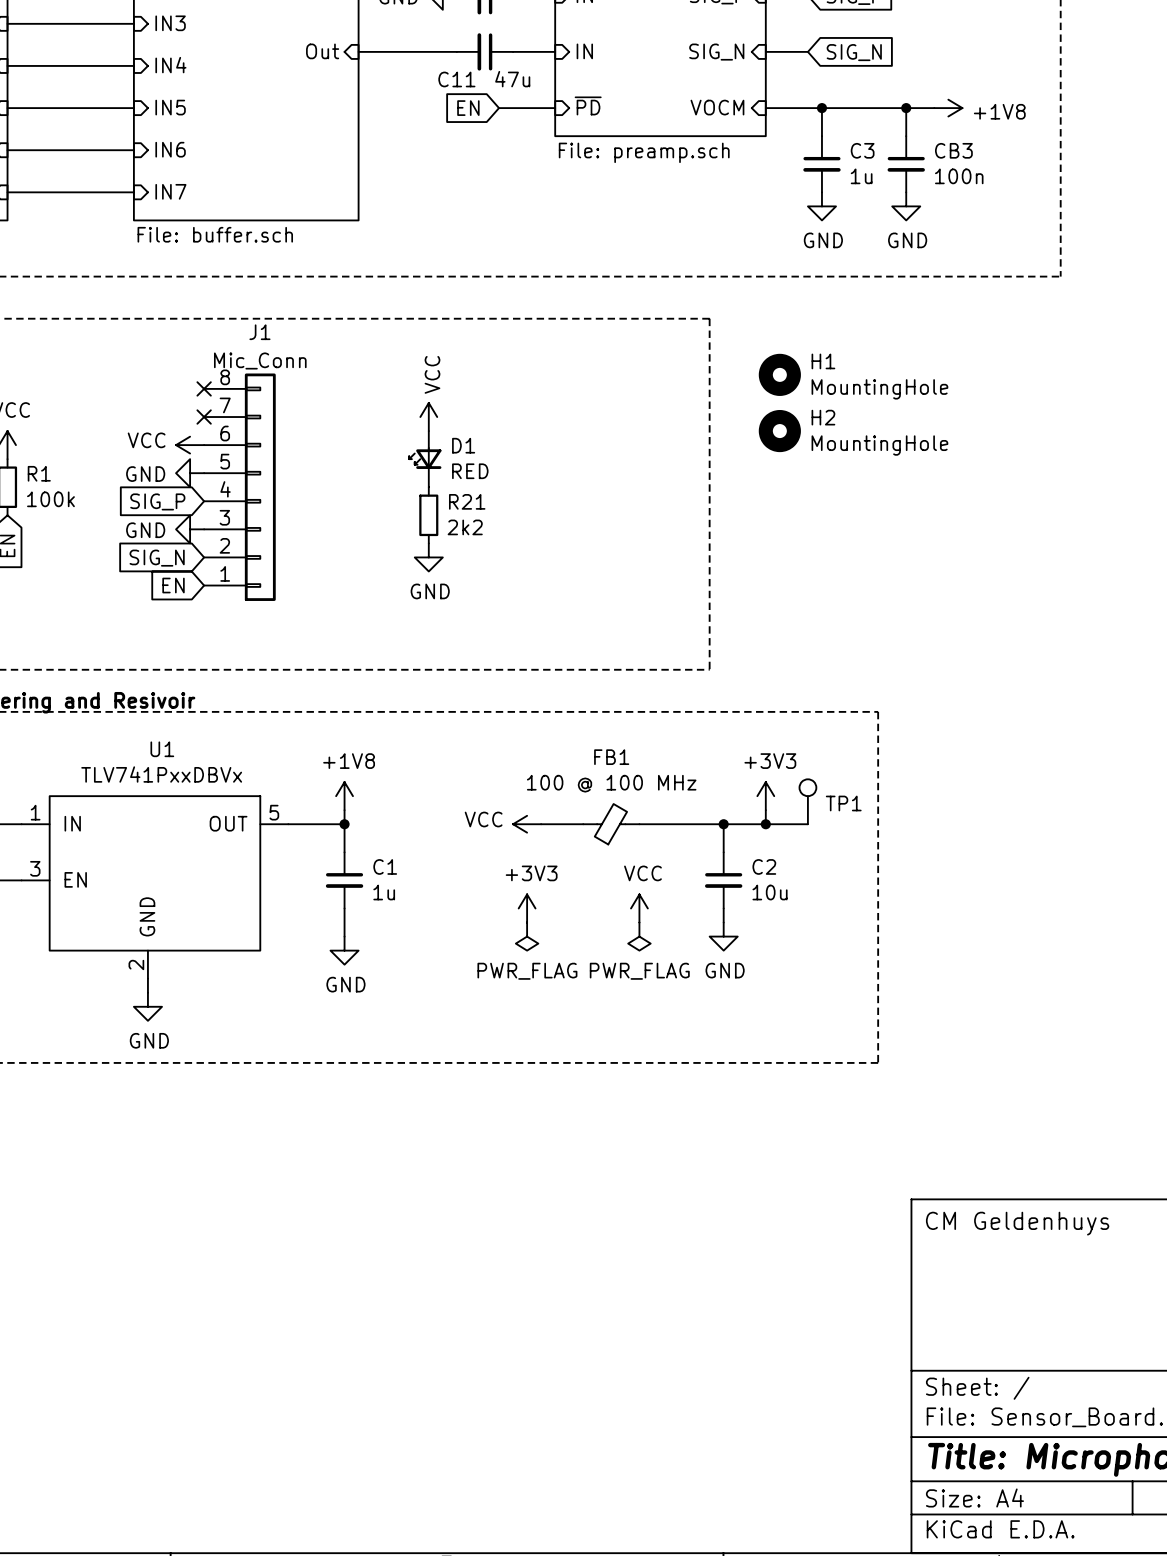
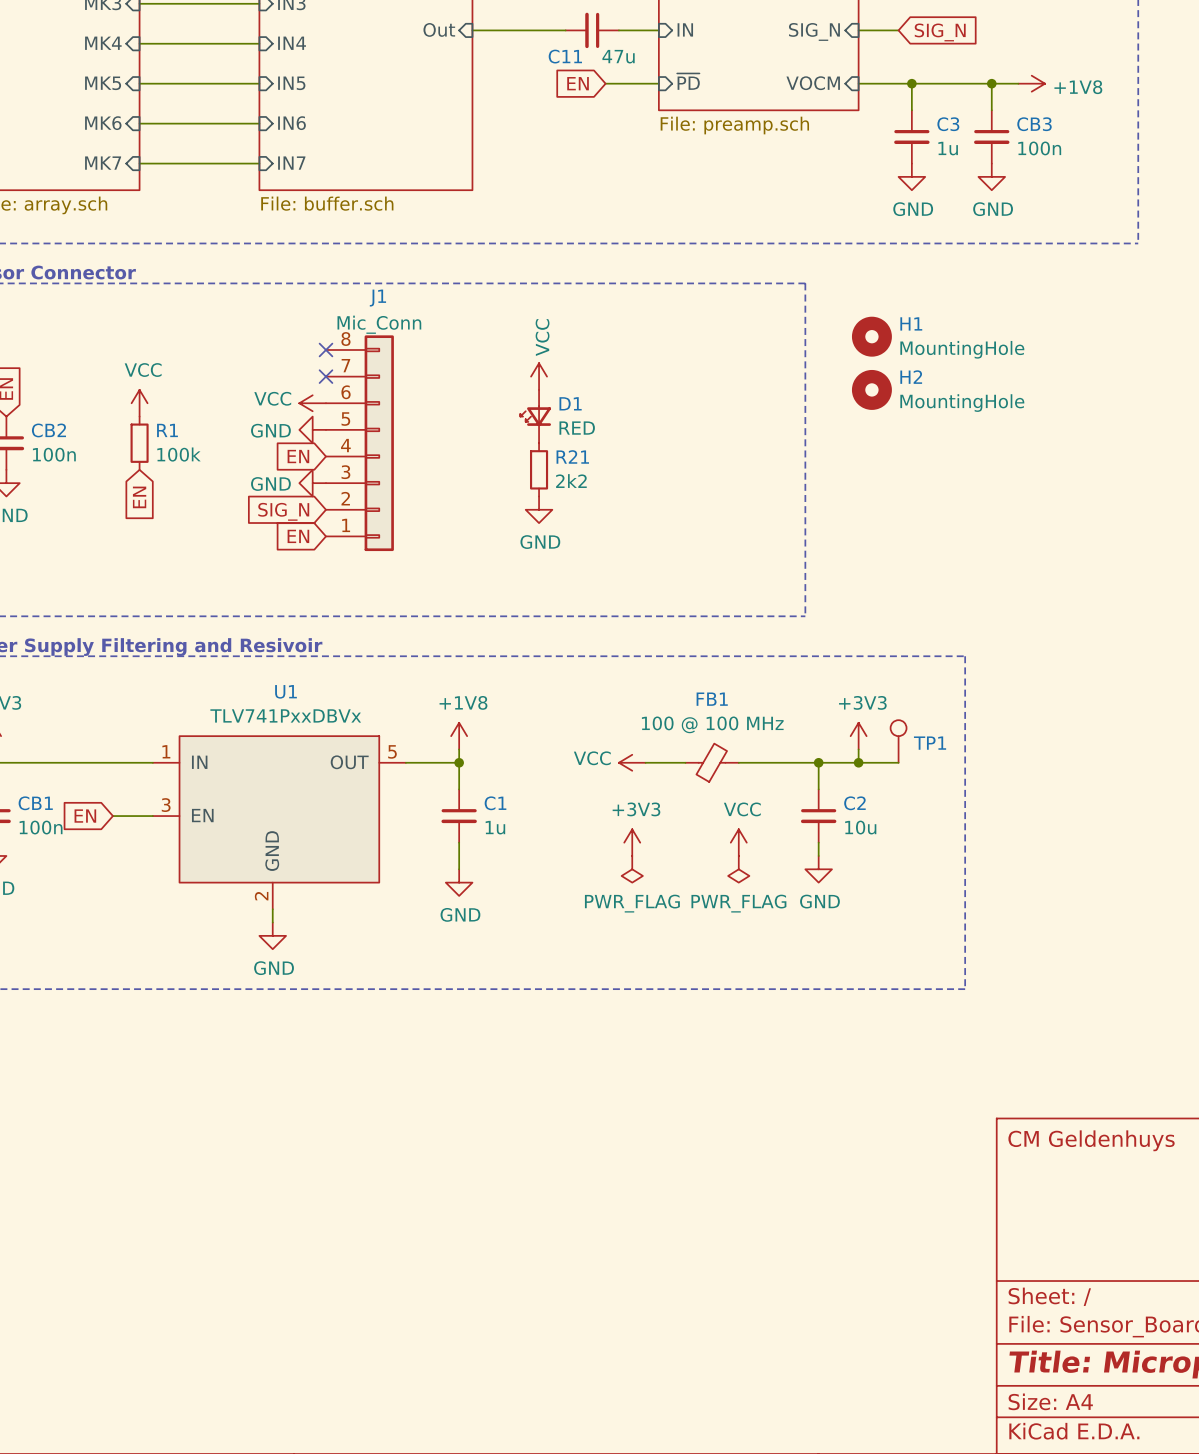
global label: SIG_P (157, 501) -> EN (298, 456)

